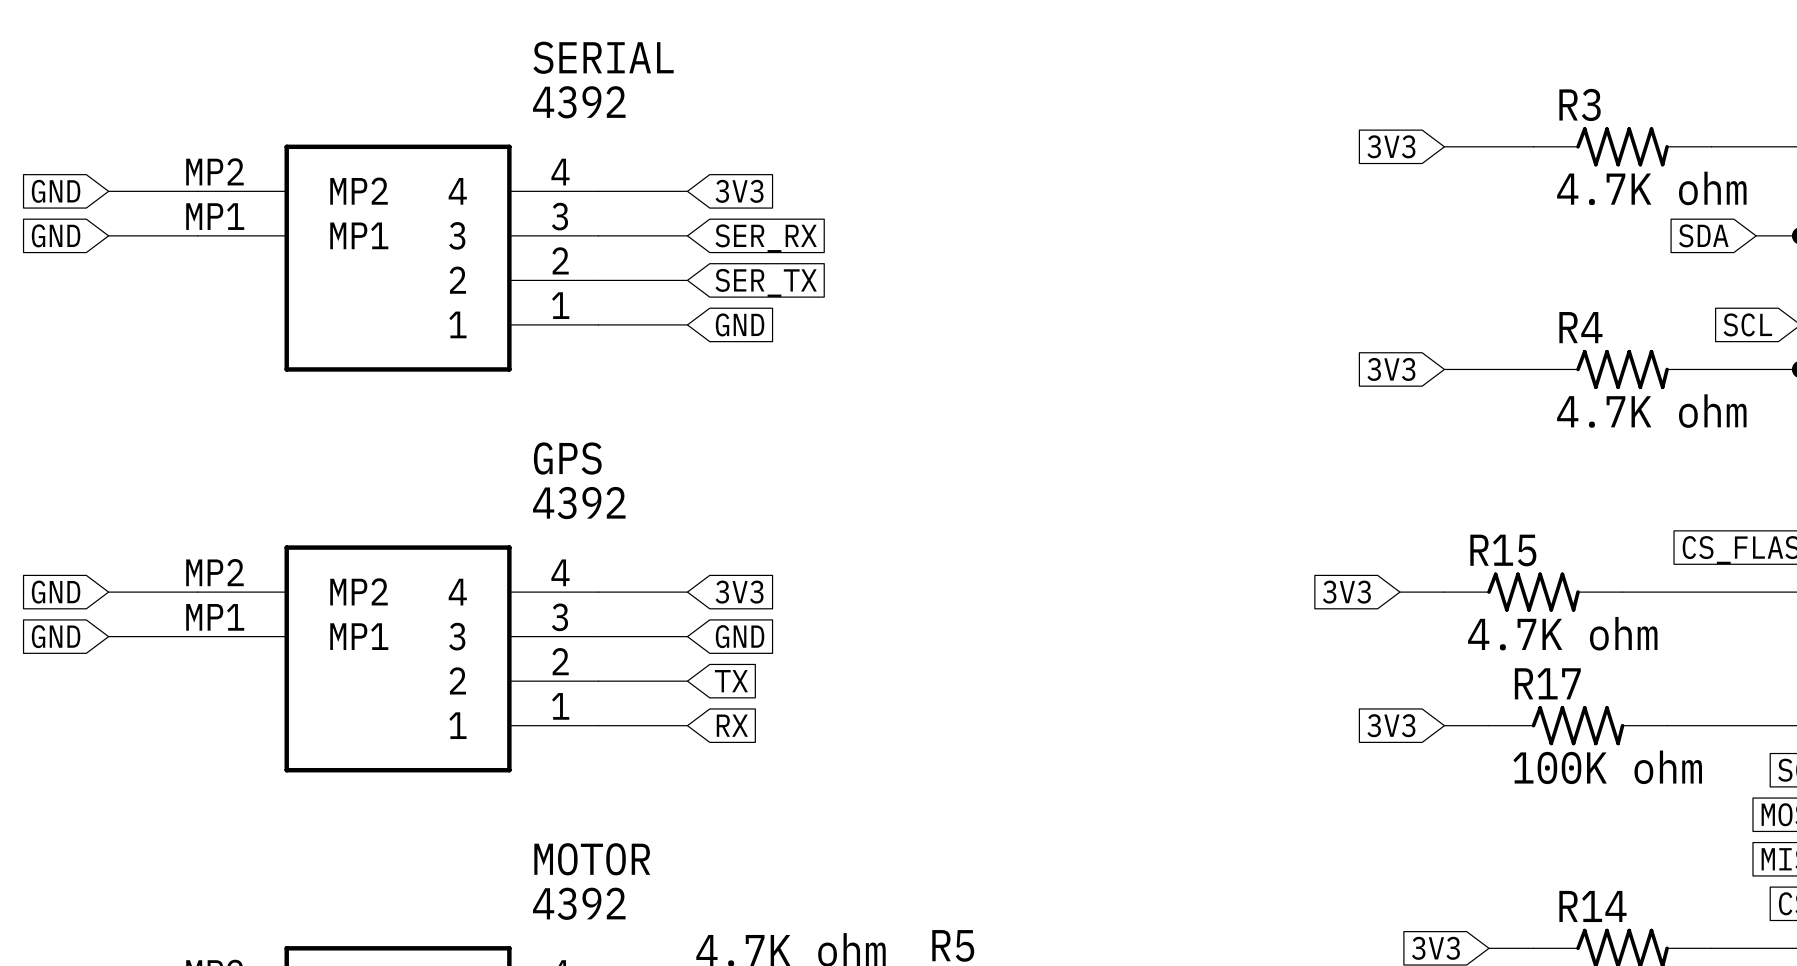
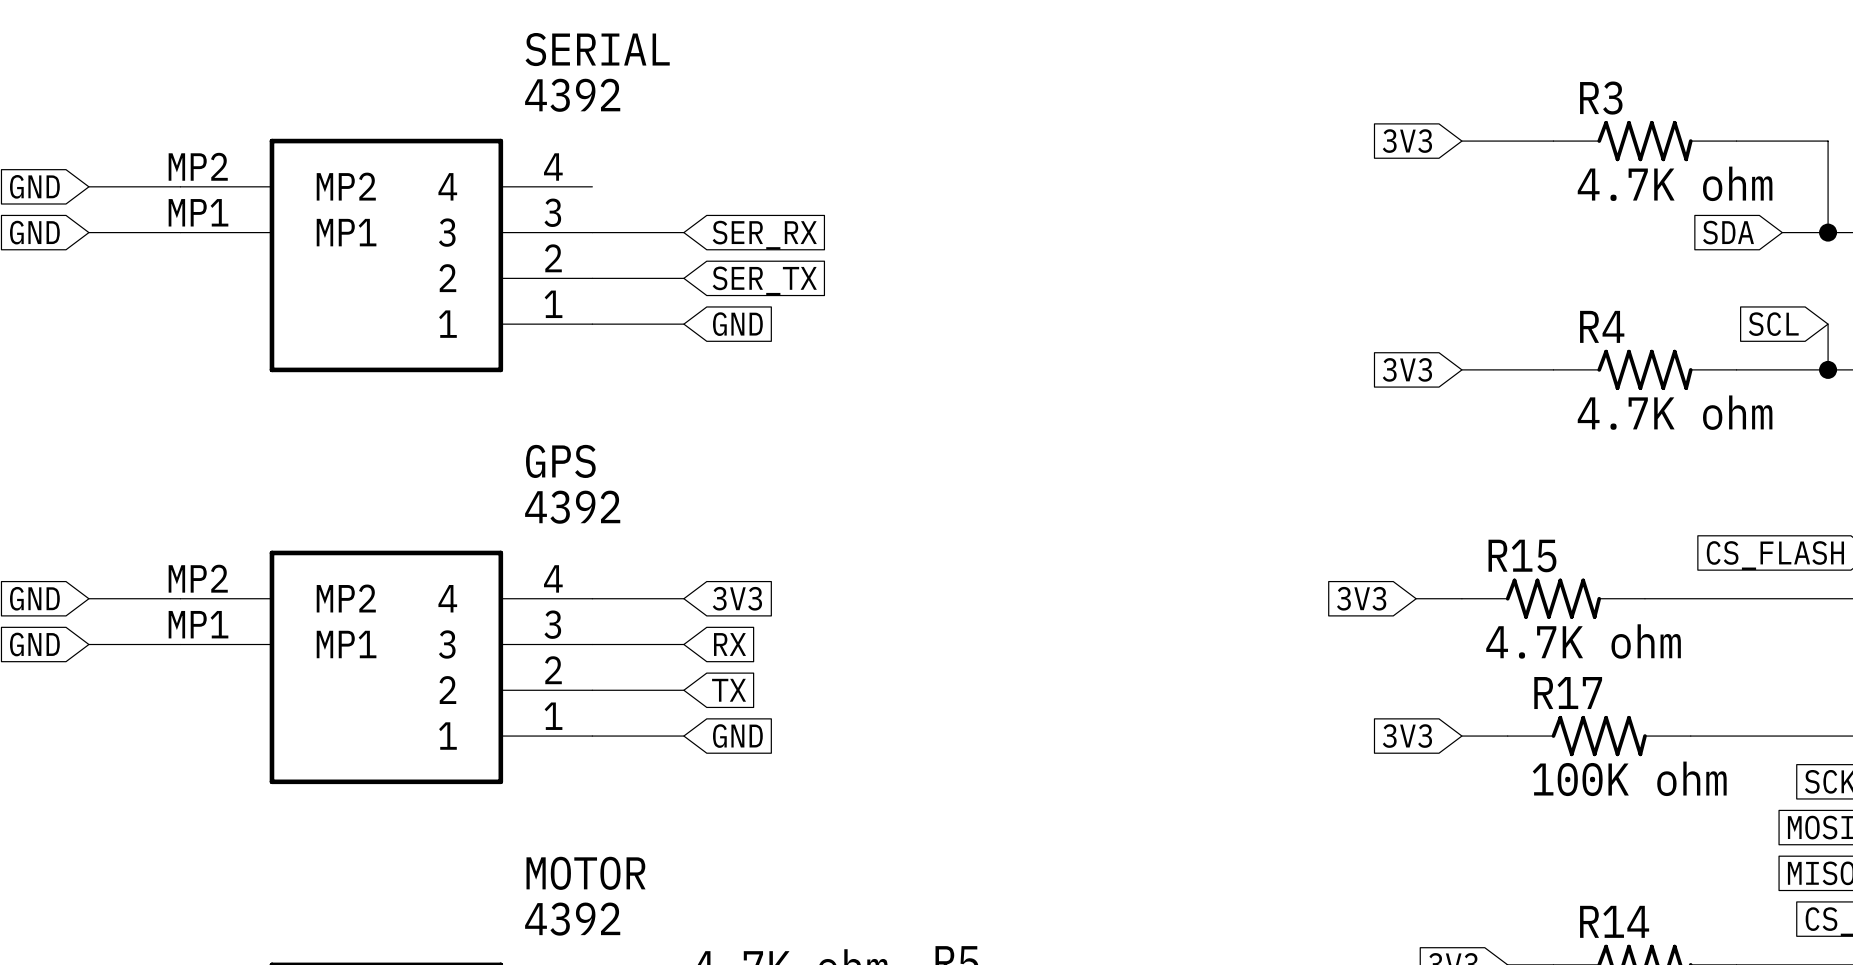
wire: (598, 191) (687, 191) -> none
global label: 3V3 (739, 191) -> none
global label: GND (740, 636) -> RX (730, 644)
global label: RX (732, 725) -> GND (737, 736)

